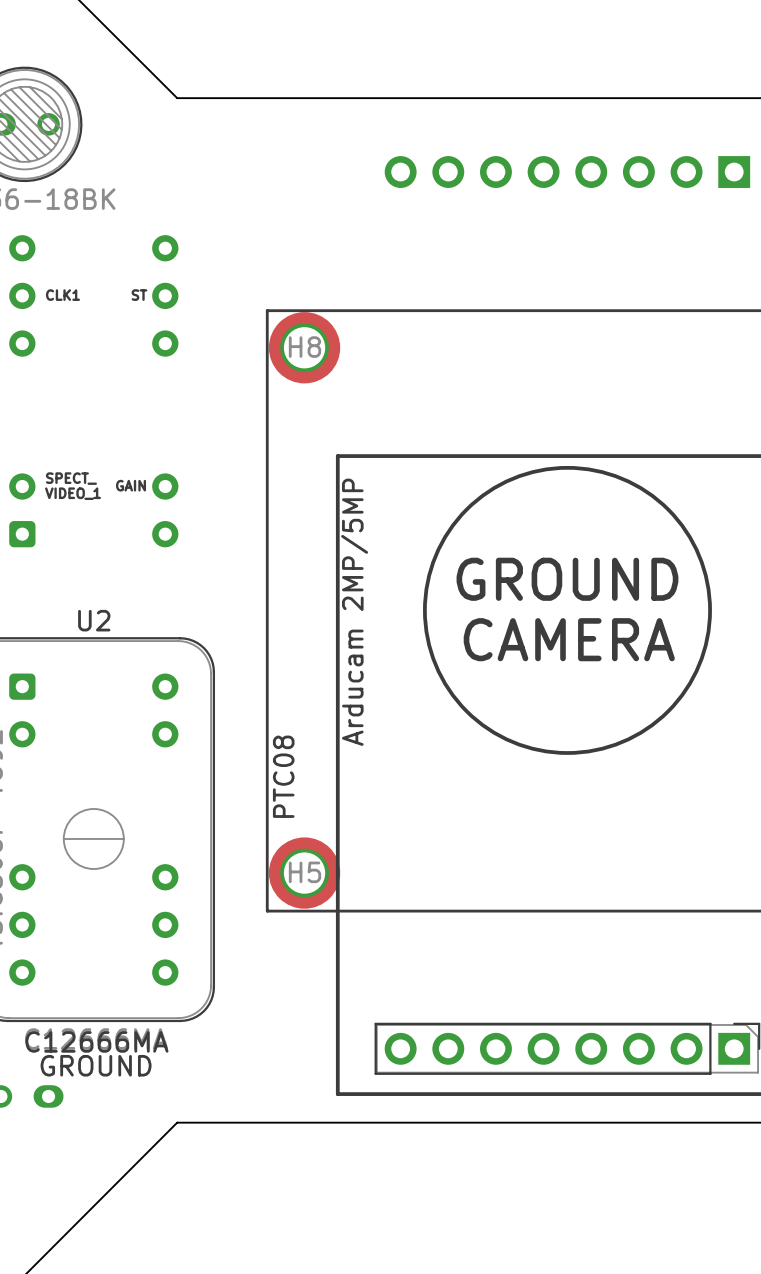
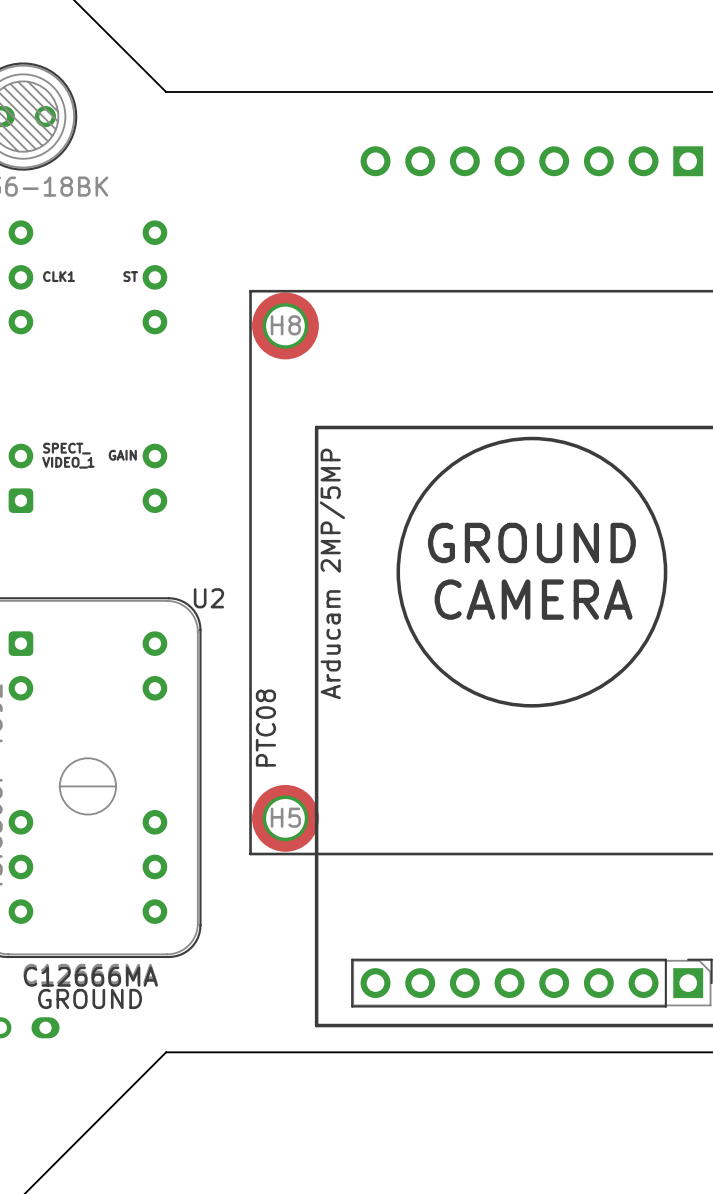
U2 name position: U2 (94, 620) -> U2 (208, 598)

